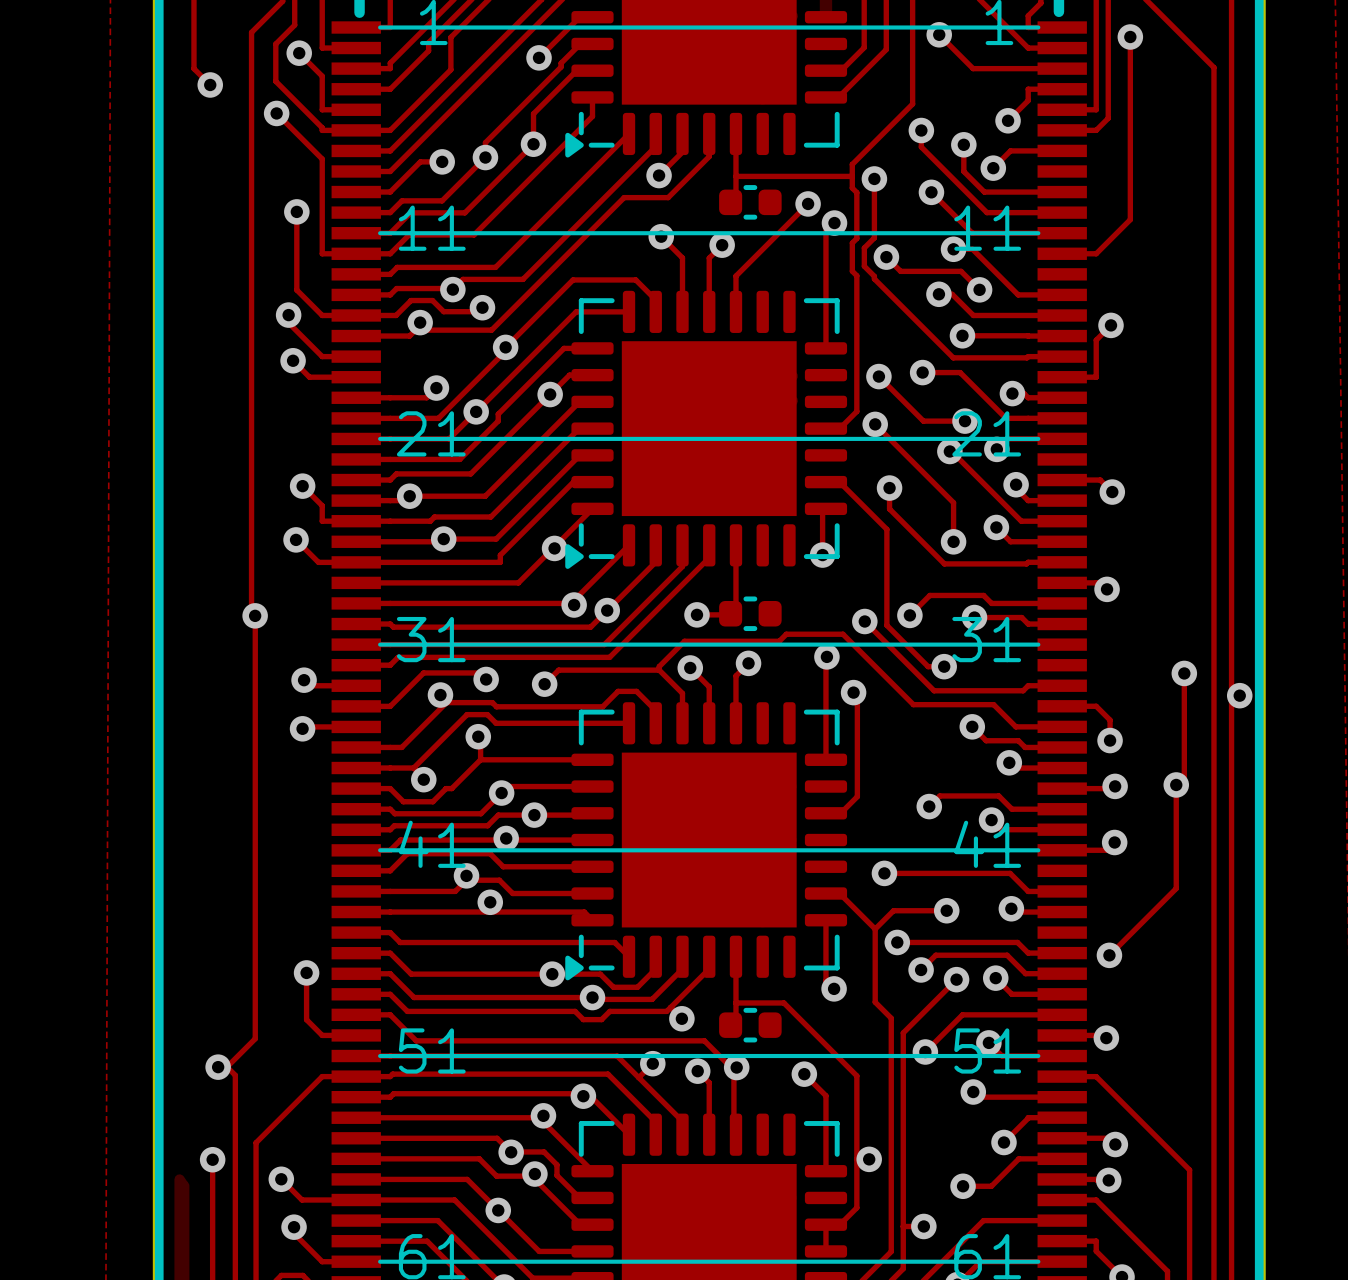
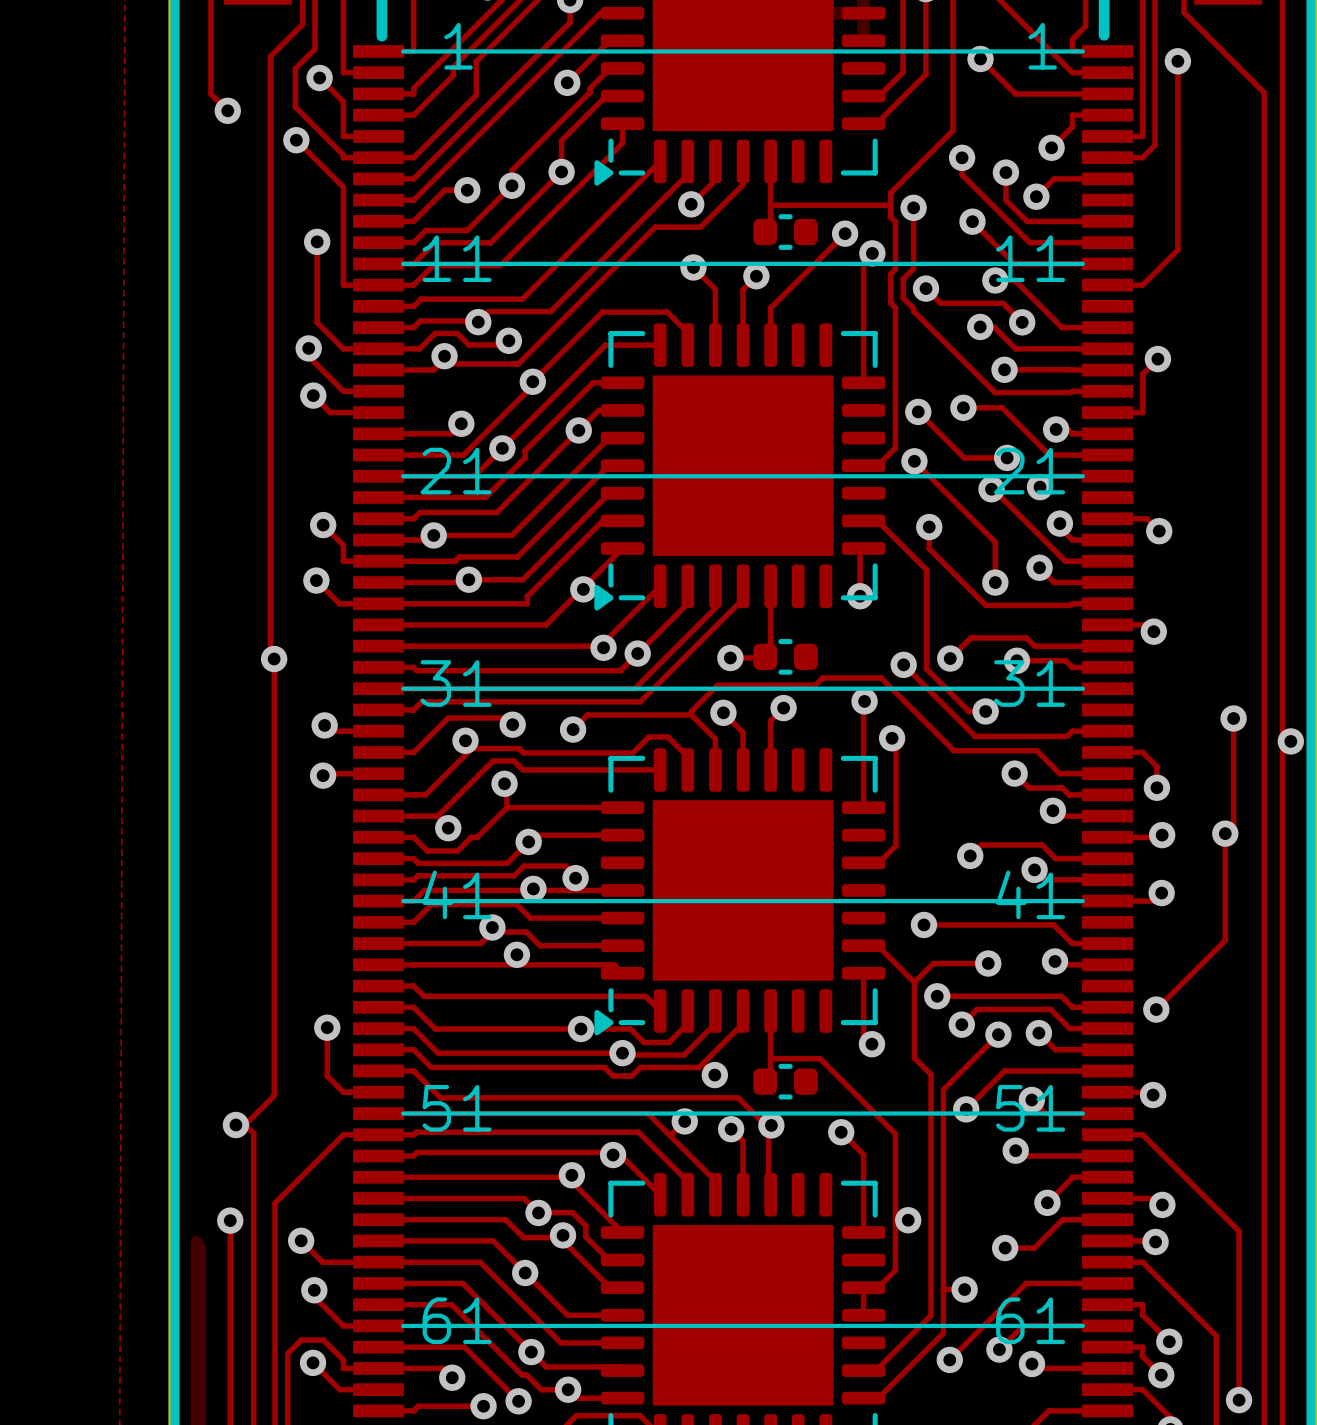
track: (592, 813) (590, 815) (497, 816) -> (575, 878) (565, 866) (523, 866)
via position: (534, 815) -> (575, 878)

